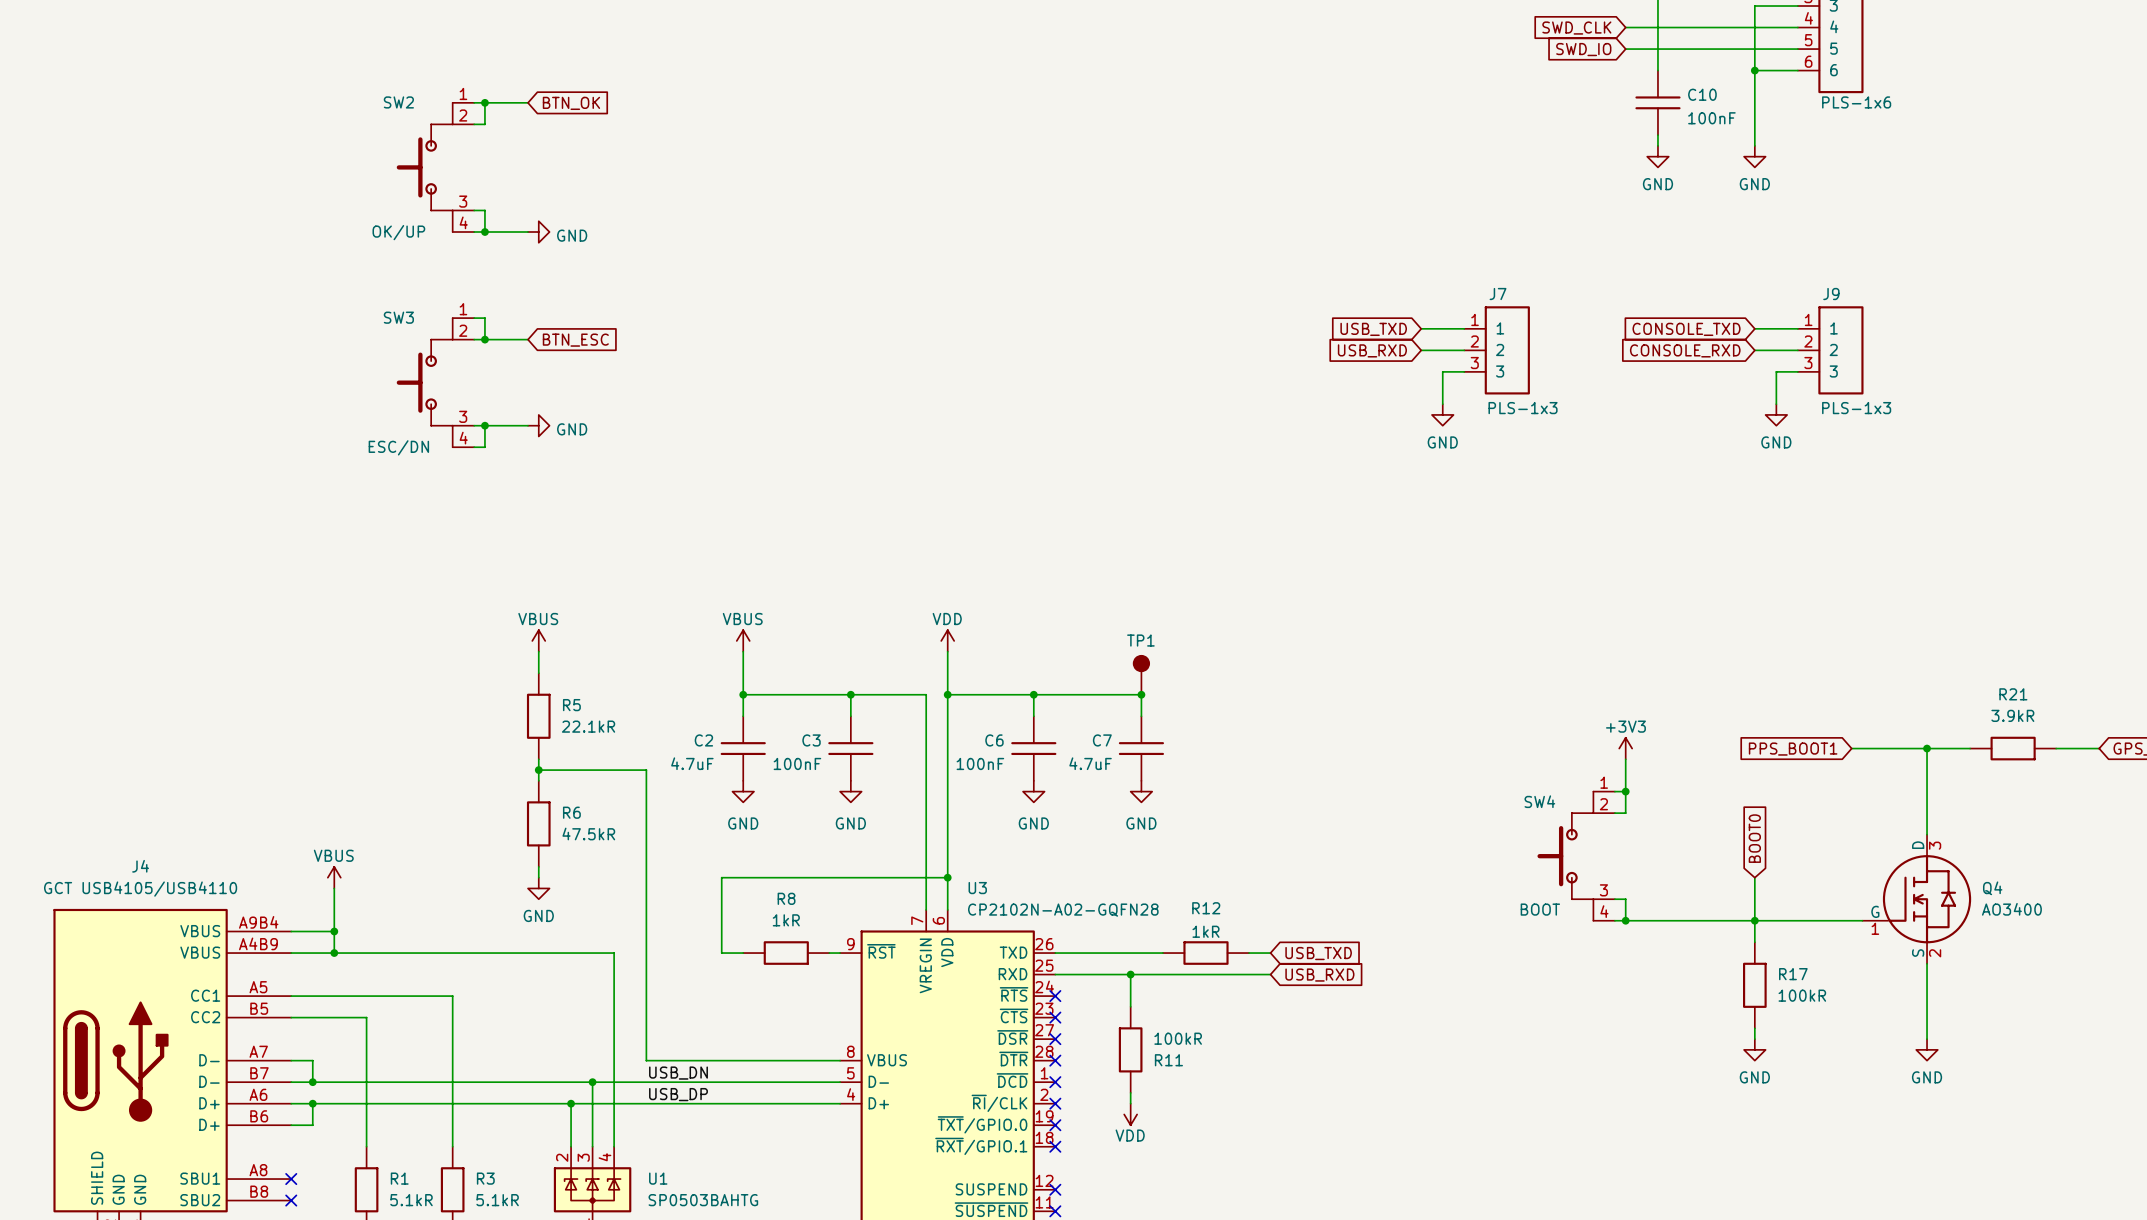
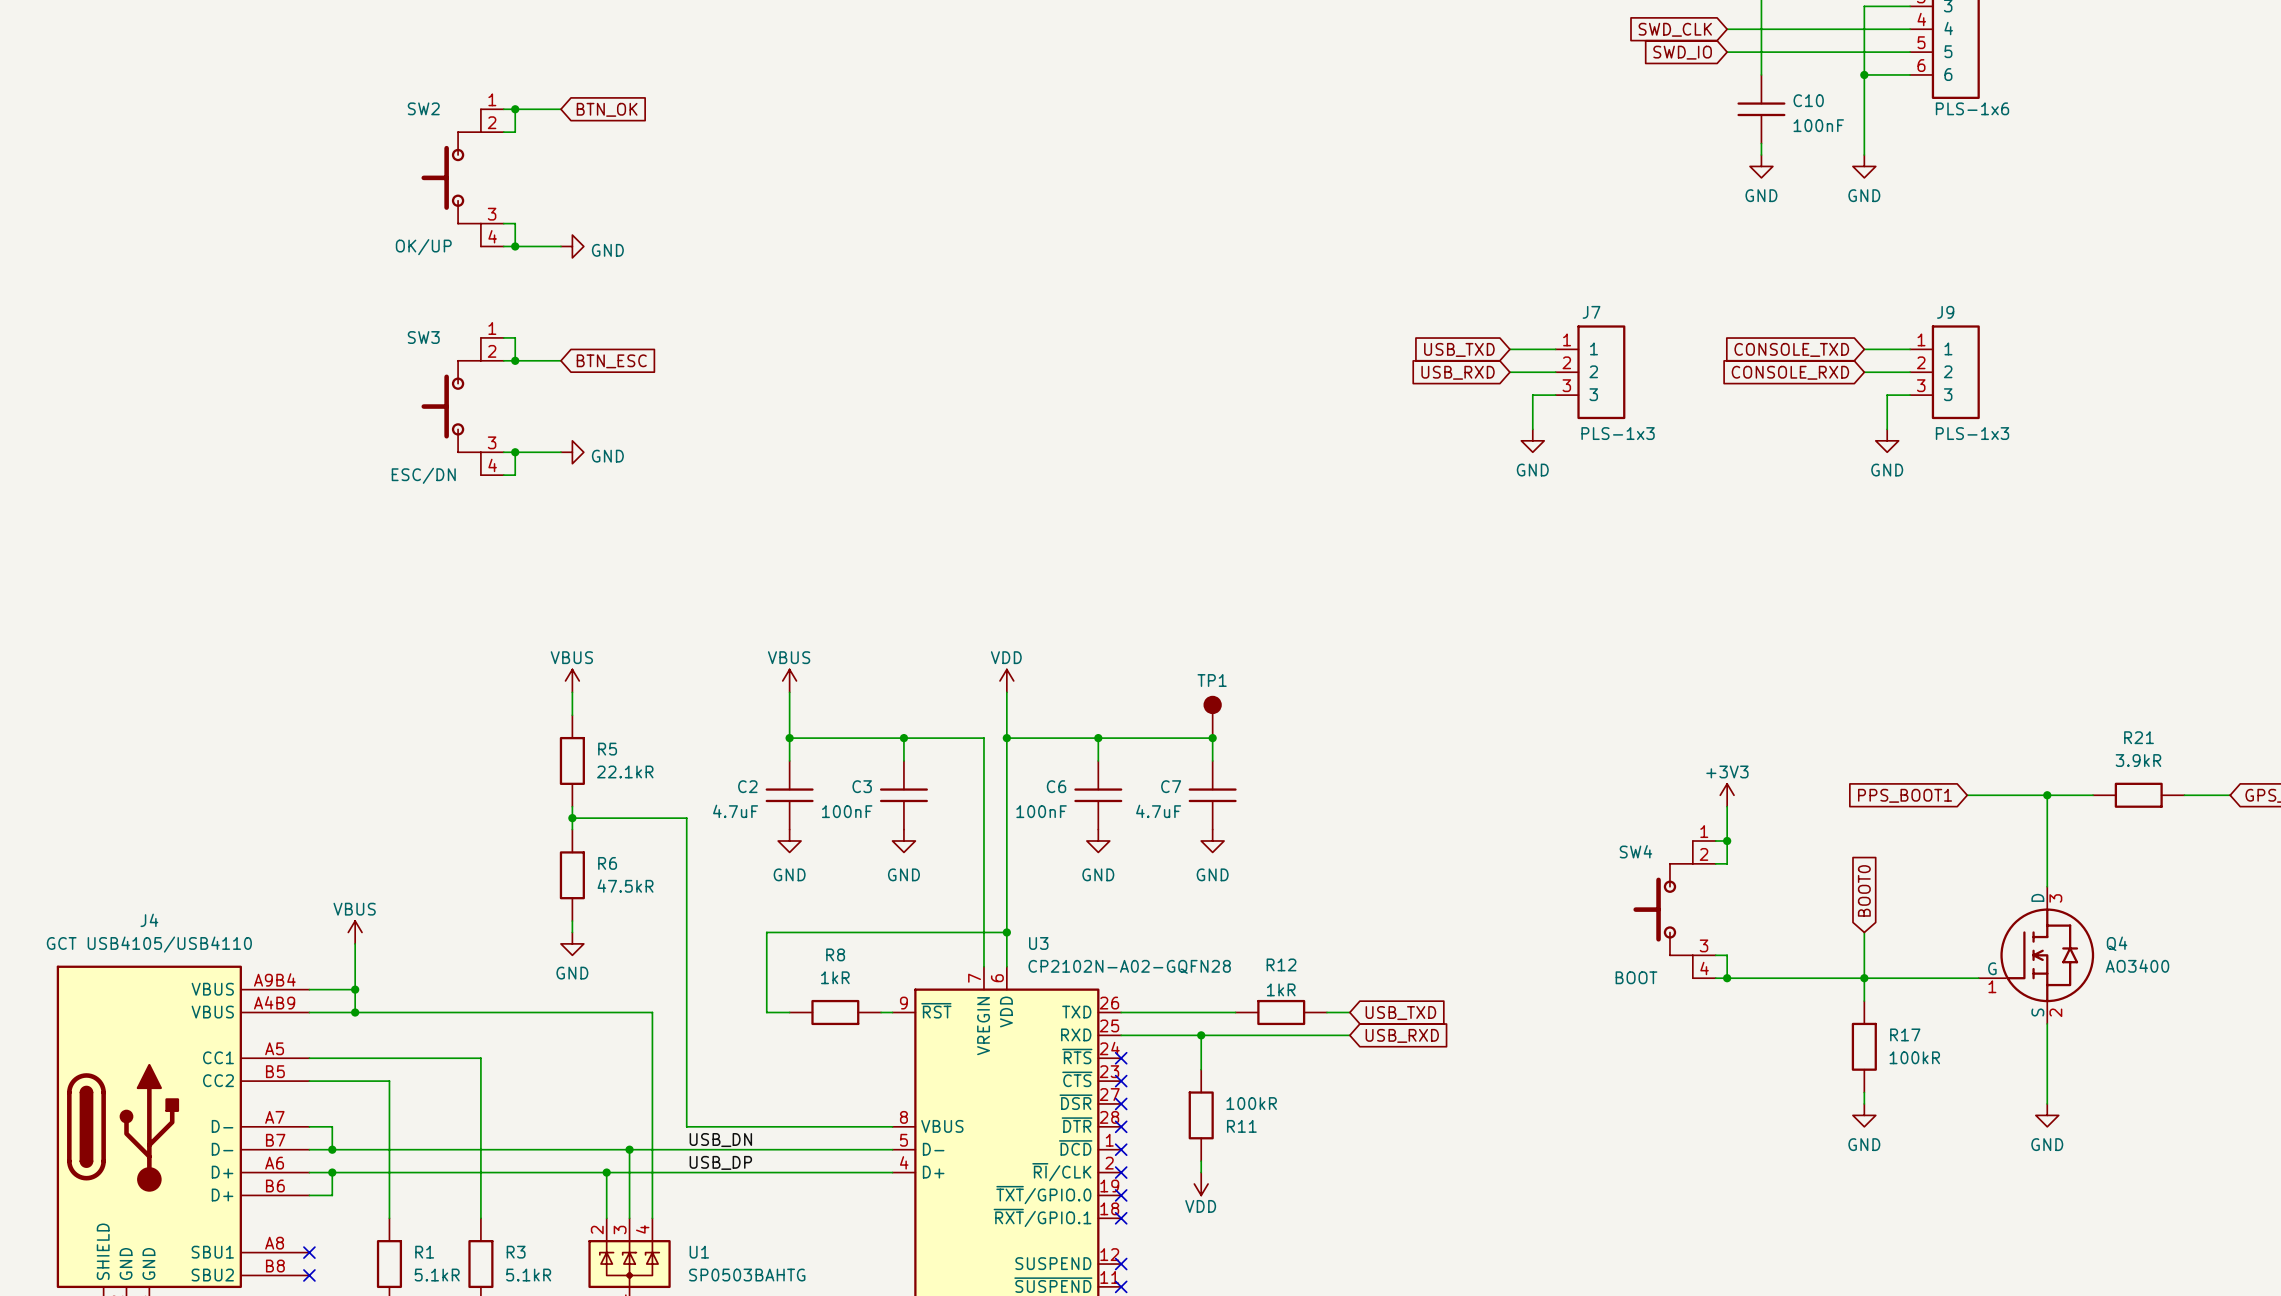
SW4 text: BOOT (1540, 909) -> none
SW4 value: none -> BOOT (1636, 977)

